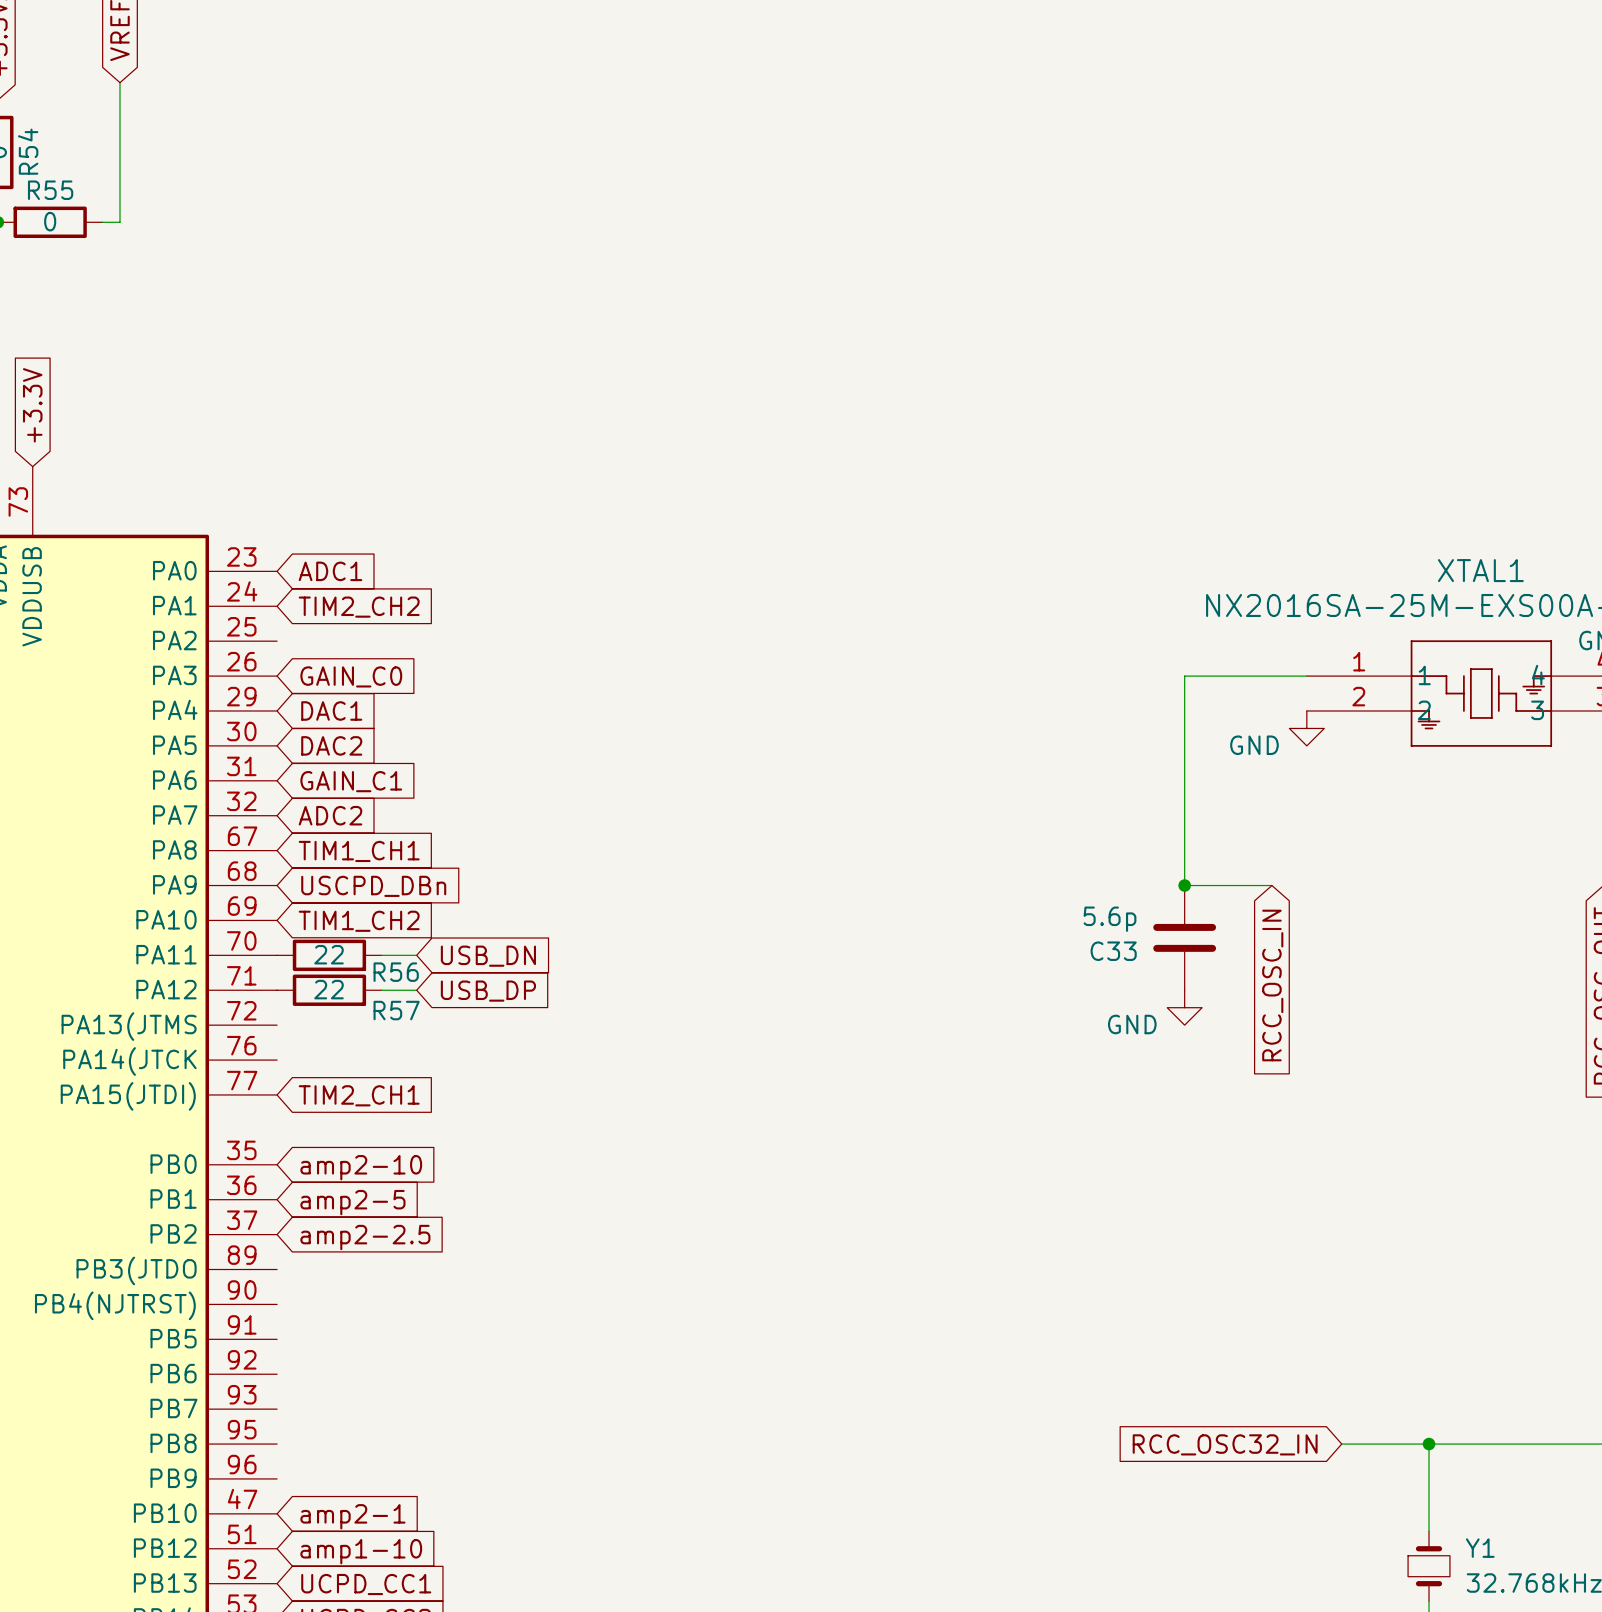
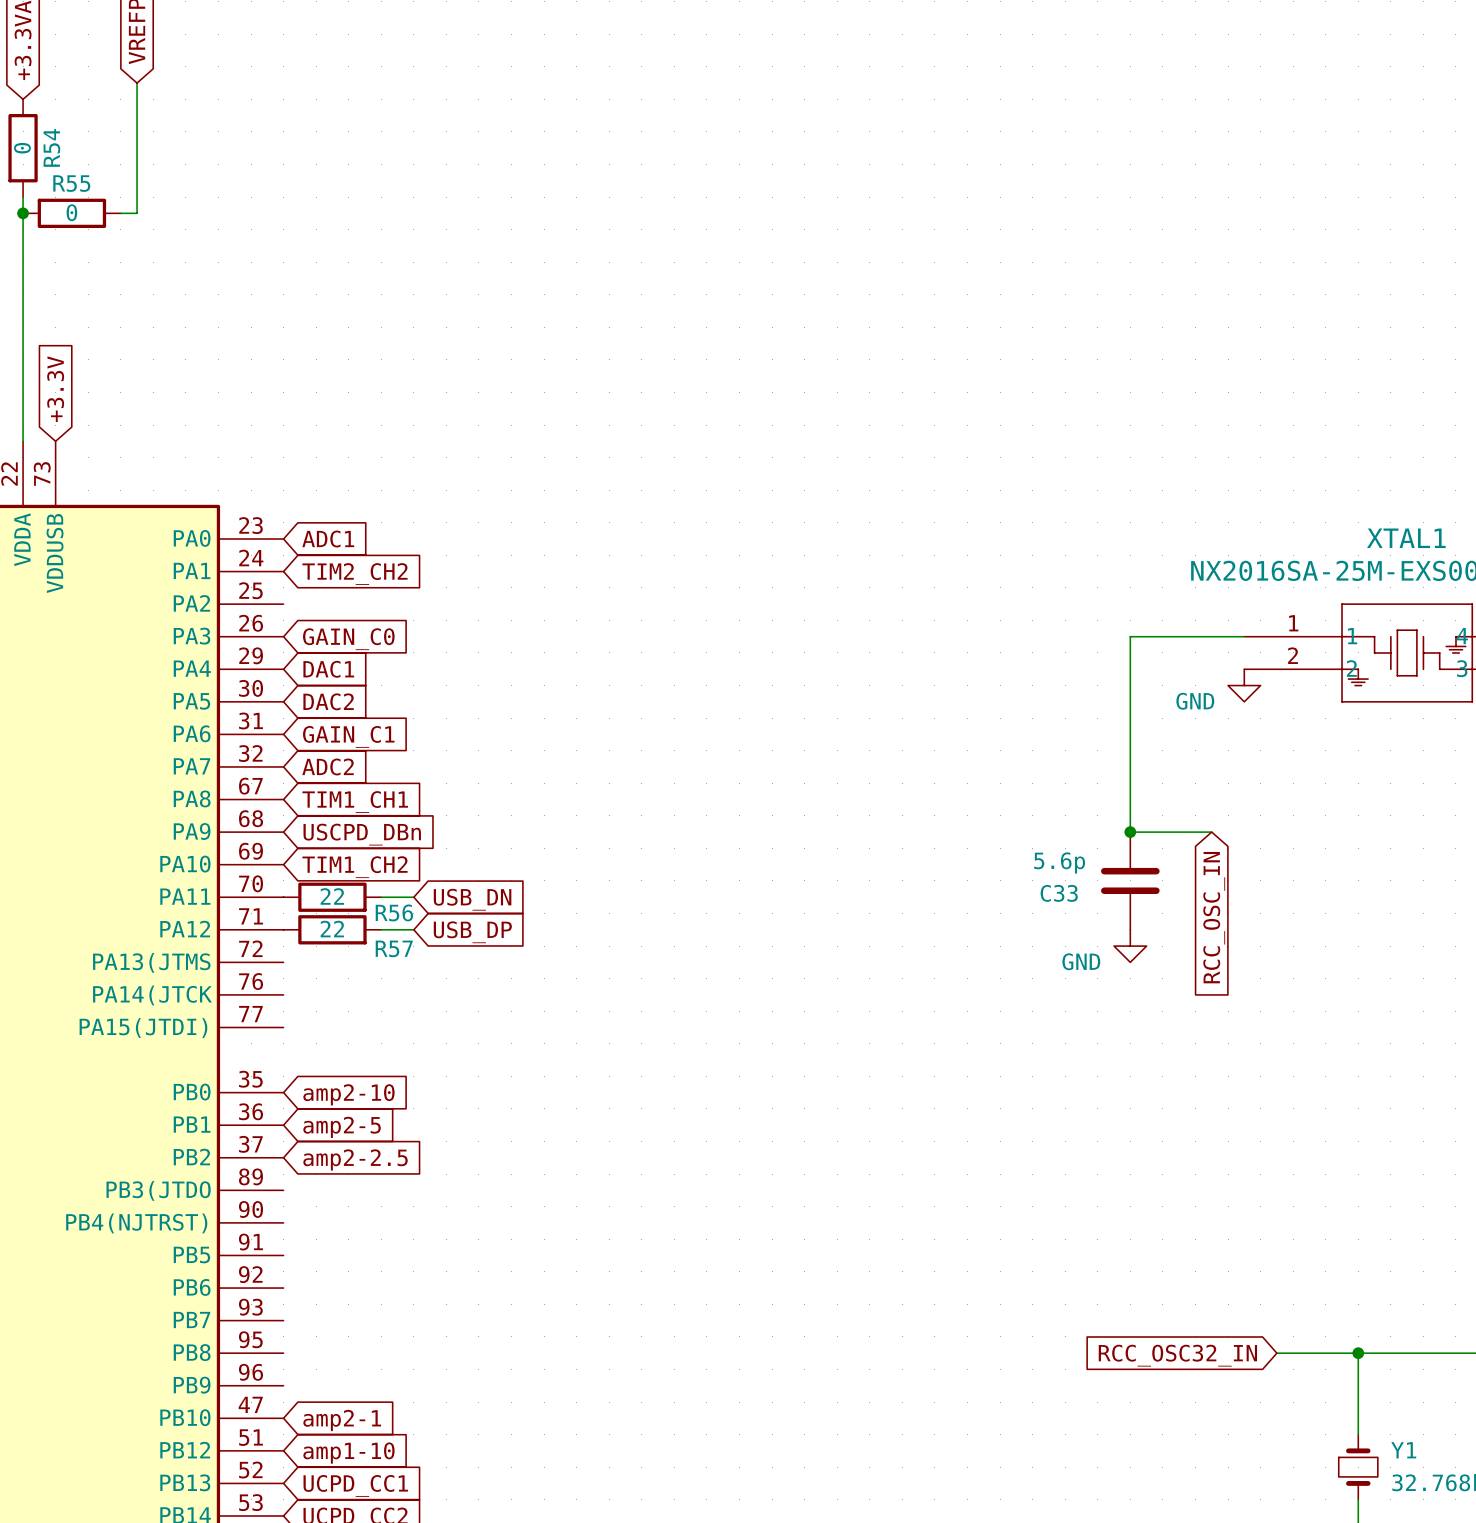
global label: TIM2_CH1 (359, 1095) -> none

